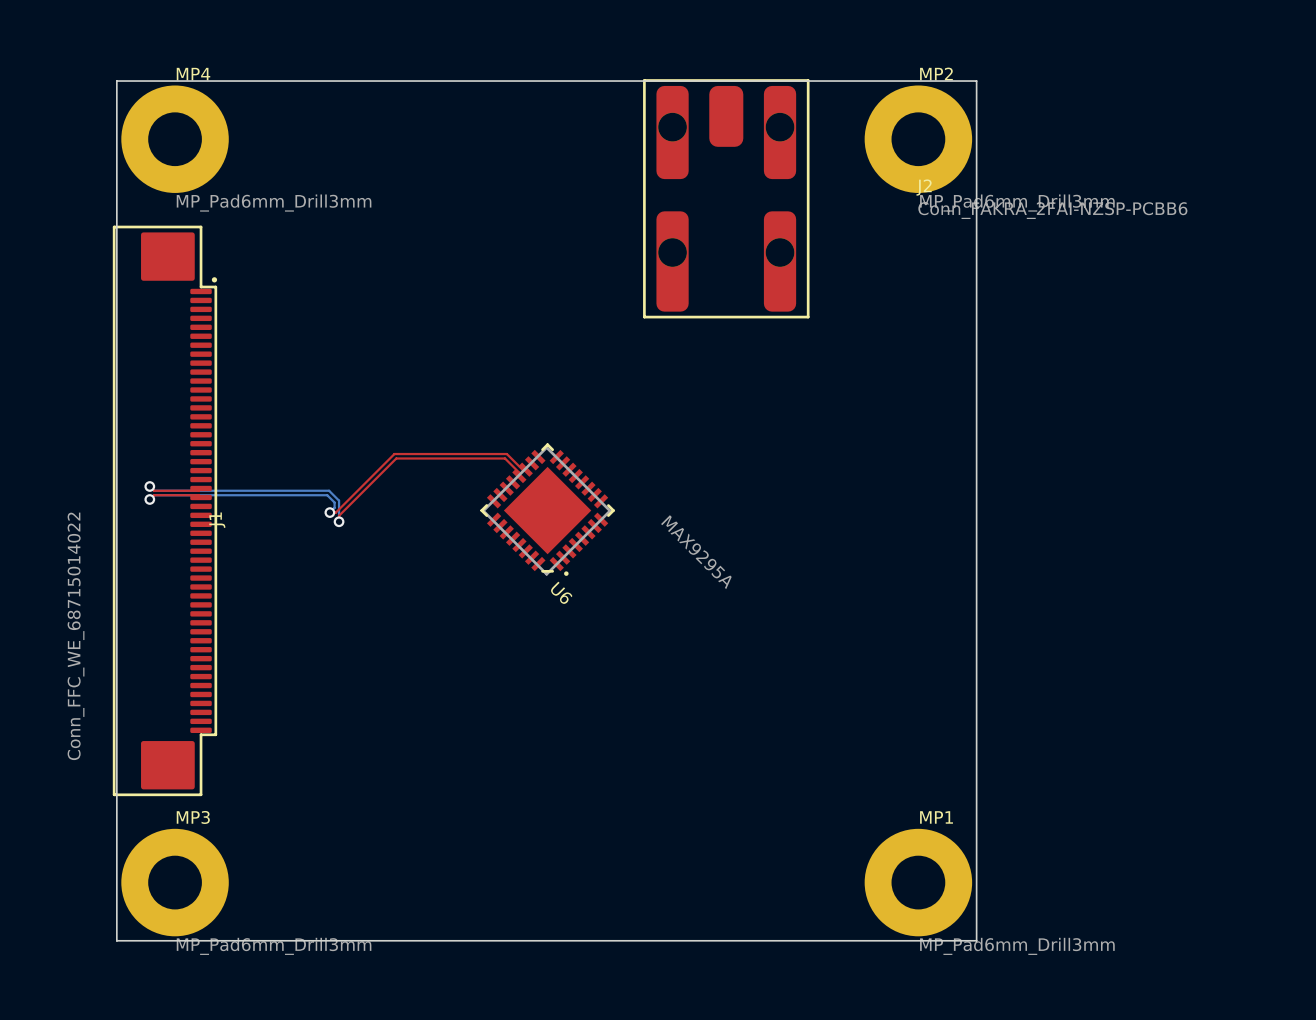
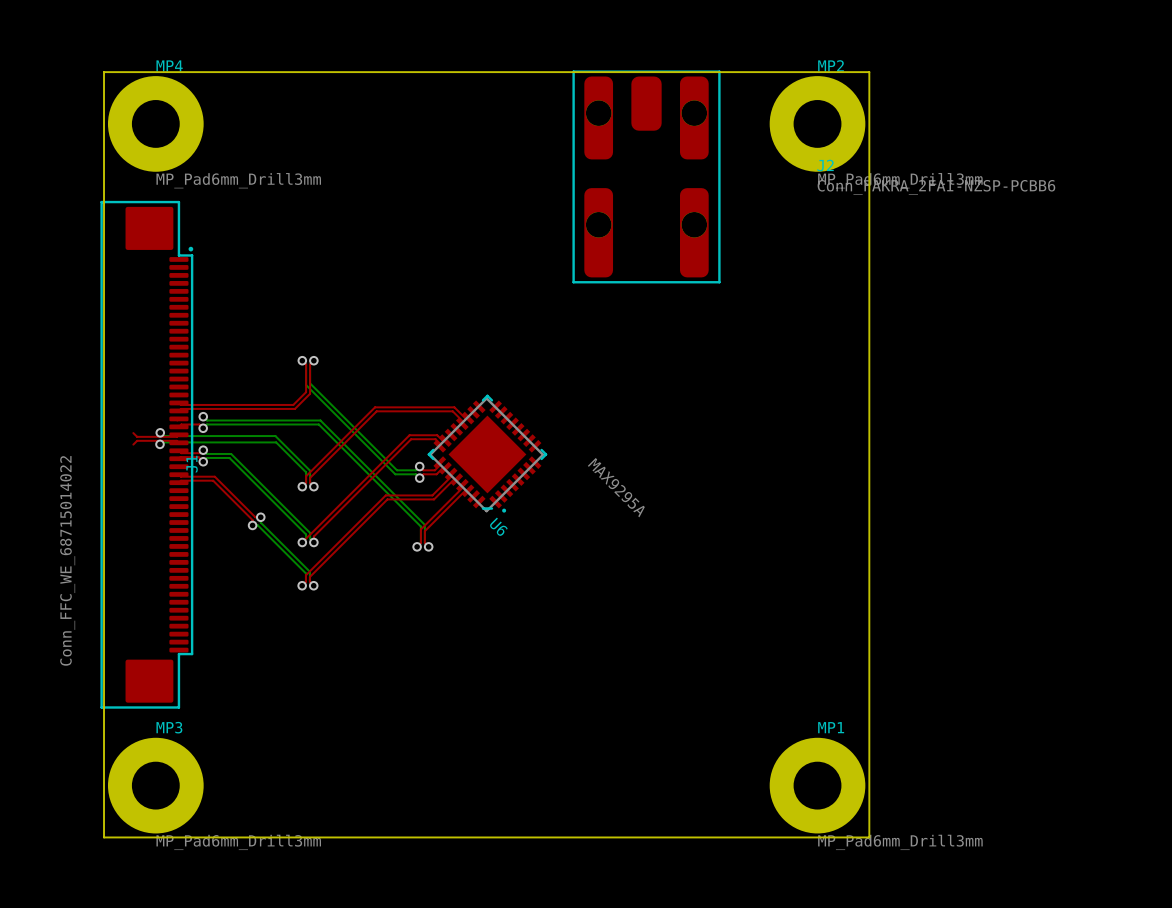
top track: none -> (302, 360) (306, 364) (306, 392) (293, 404) (180, 404) (178, 402)
bottom track: none -> (302, 360) (306, 364) (306, 385) (395, 474) (415, 474) (419, 478)
via: none -> (302, 360)
top track: none -> (313, 360) (310, 364) (310, 393) (294, 408) (180, 408) (178, 410)
bottom track: none -> (313, 360) (310, 364) (310, 383) (397, 470) (415, 470) (419, 466)
via: none -> (313, 360)
top track: (510, 457) (506, 454) (394, 454) (335, 512) (329, 512) -> (454, 407) (375, 407) (306, 476) (306, 482) (302, 486)
top track: (508, 462) (505, 458) (396, 458) (339, 515) (339, 521) -> (452, 411) (376, 411) (310, 477) (310, 482) (313, 486)
bottom track: none -> (203, 416) (207, 420) (320, 420) (424, 524) (424, 543) (428, 546)
via: none -> (203, 416)
top track: none -> (178, 426) (199, 424) (203, 428)
bottom track: none -> (203, 428) (206, 424) (318, 424) (420, 526) (420, 543) (417, 546)
via: none -> (203, 428)
bottom track: (149, 486) (154, 490) (329, 490) (339, 500) (339, 521) -> none
via: (149, 486) -> none
bottom track: none -> (160, 432) (163, 436) (275, 436) (310, 470) (310, 482) (313, 486)
via: none -> (160, 432)
top track: none -> (445, 440) (442, 440) (437, 435) (409, 435) (302, 542)
bottom track: (149, 499) (154, 495) (327, 495) (334, 502) (334, 507) (329, 512) -> none
via: (149, 499) -> none
bottom track: none -> (159, 444) (161, 442) (276, 442) (306, 472) (306, 482) (302, 486)
via: none -> (159, 444)
top track: none -> (439, 446) (435, 439) (411, 439) (313, 536) (313, 542)
top track: none -> (203, 450) (200, 453) (181, 453) (178, 450)
bottom track: none -> (203, 450) (207, 453) (231, 453) (310, 532) (310, 538) (313, 542)
via: none -> (203, 450)
via: (329, 512) -> none
top track: none -> (178, 458) (198, 457) (203, 461)
bottom track: none -> (203, 461) (207, 457) (229, 457) (306, 534) (306, 538) (302, 542)
via: none -> (203, 461)
top track: none -> (439, 462) (439, 465) (434, 470) (423, 470) (419, 466)
via: (339, 521) -> none
via: none -> (419, 466)
top track: none -> (445, 468) (442, 468) (436, 474) (423, 474) (419, 478)
top track: none -> (451, 473) (451, 476) (432, 495) (385, 495) (305, 575) (305, 581) (302, 585)
top track: none -> (178, 474) (180, 476) (214, 476) (255, 517) (260, 517)
via: none -> (419, 478)
top track: none -> (456, 479) (453, 479) (434, 499) (387, 499) (309, 576) (309, 581) (313, 585)
top track: none -> (178, 482) (180, 480) (213, 480) (252, 520) (252, 525)
top track: none -> (462, 485) (462, 488) (420, 529) (420, 543) (417, 546)
via: none -> (302, 486)
via: none -> (313, 486)
top track: none -> (468, 490) (465, 490) (424, 531) (424, 543) (428, 546)
bottom track: none -> (260, 517) (260, 522) (309, 571) (309, 581) (313, 585)
via: none -> (260, 517)
bottom track: none -> (252, 525) (257, 525) (305, 573) (305, 581) (302, 585)
via: none -> (252, 525)
via: none -> (302, 542)
via: none -> (313, 542)
via: none -> (417, 546)
via: none -> (428, 546)
via: none -> (302, 585)
via: none -> (313, 585)

